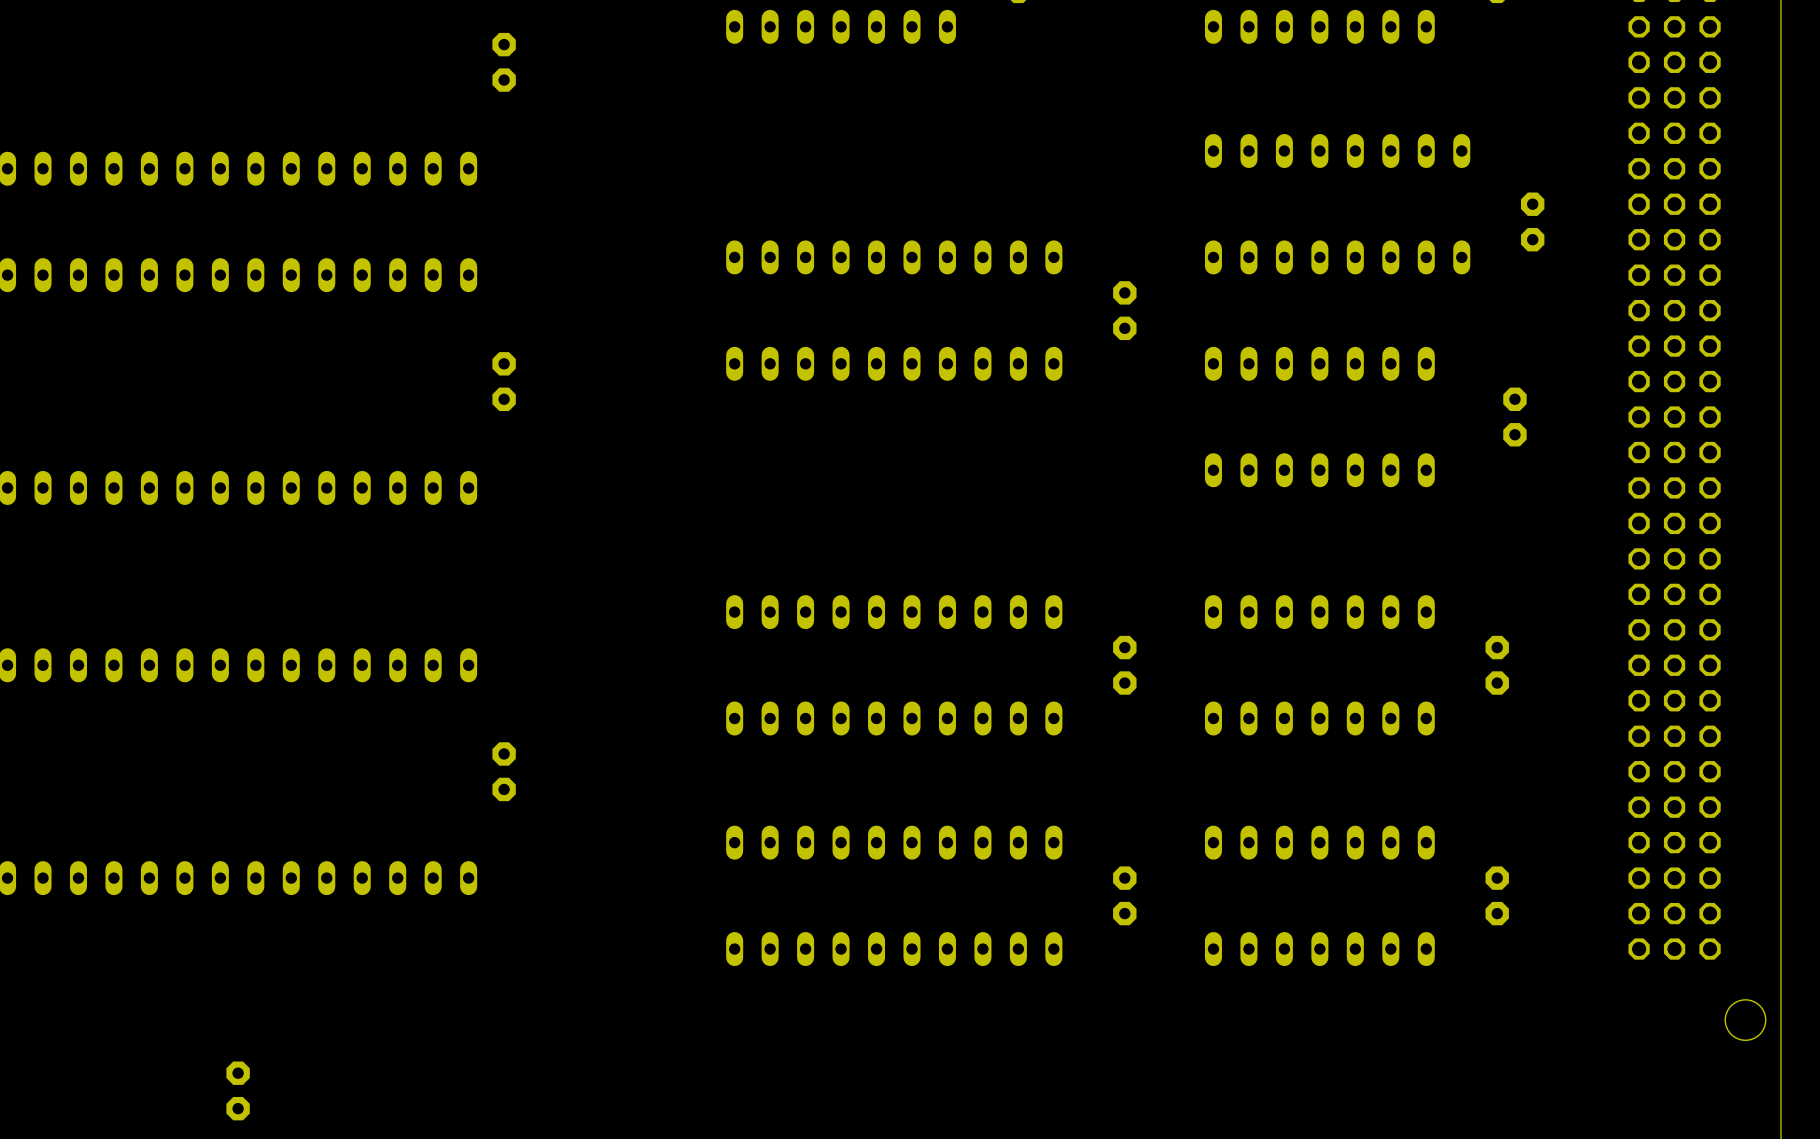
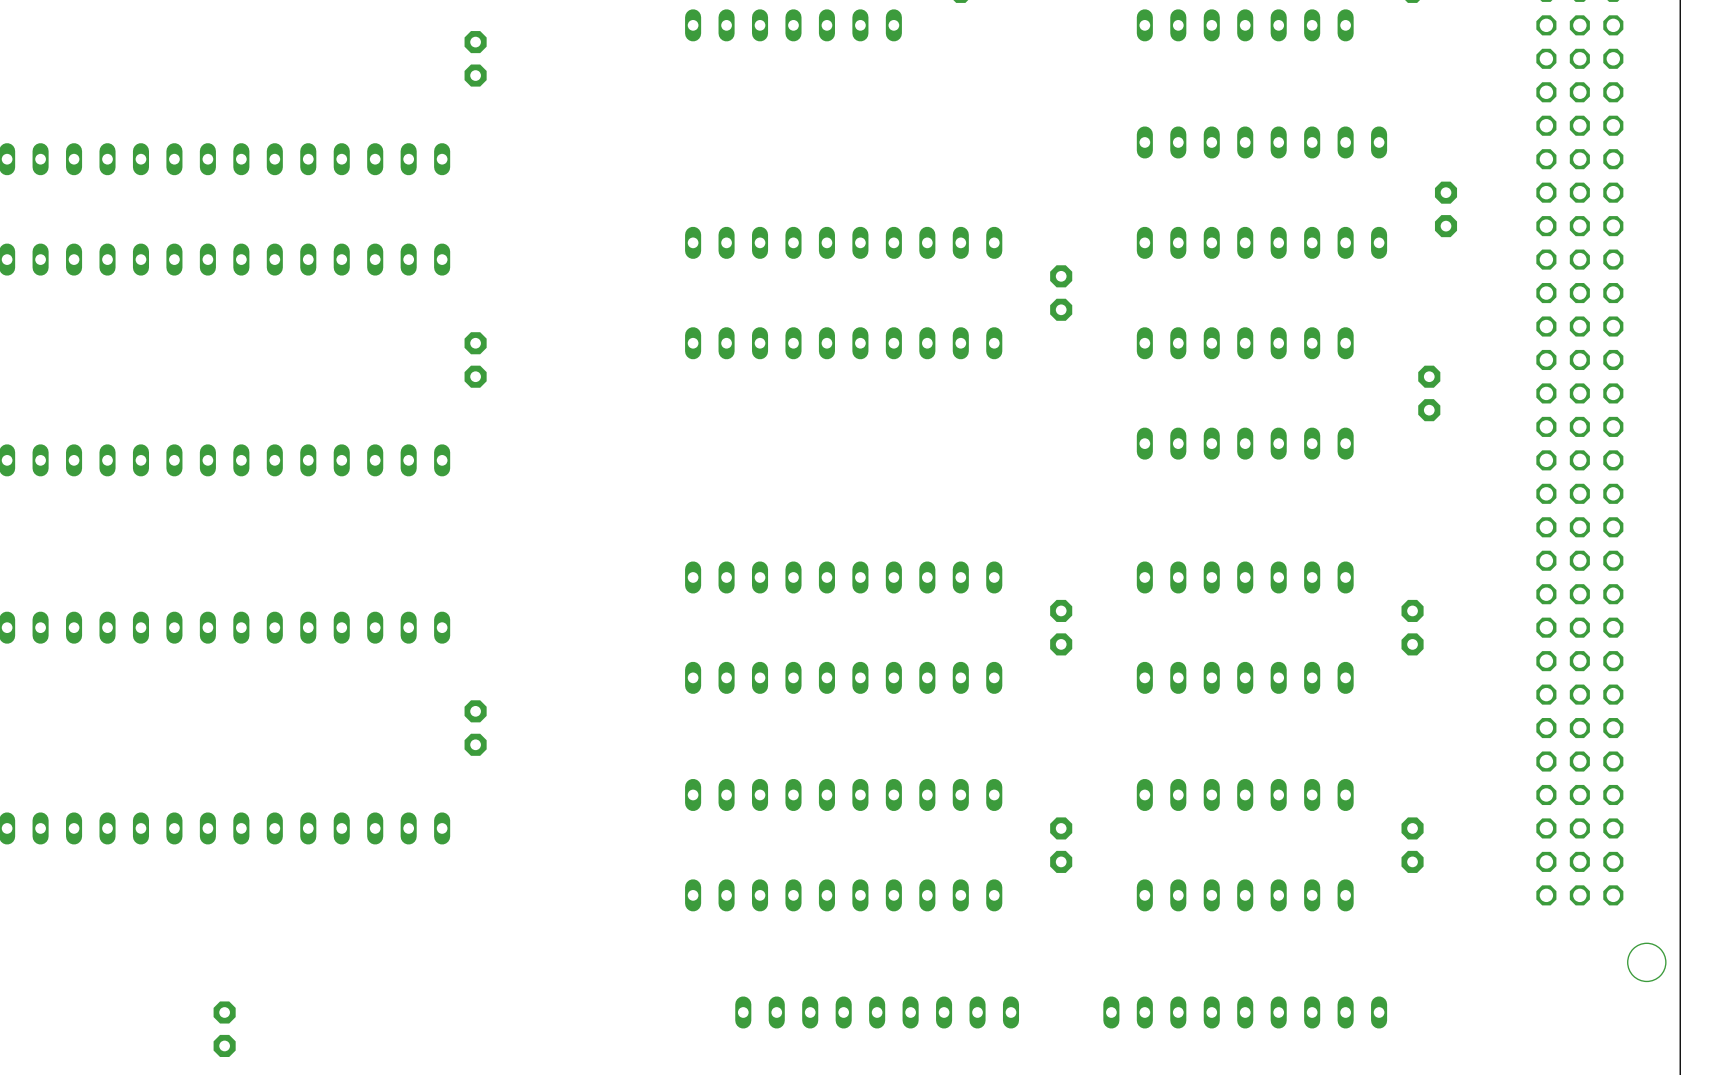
part: none -> (877, 1012)
part: none -> (1245, 1012)

